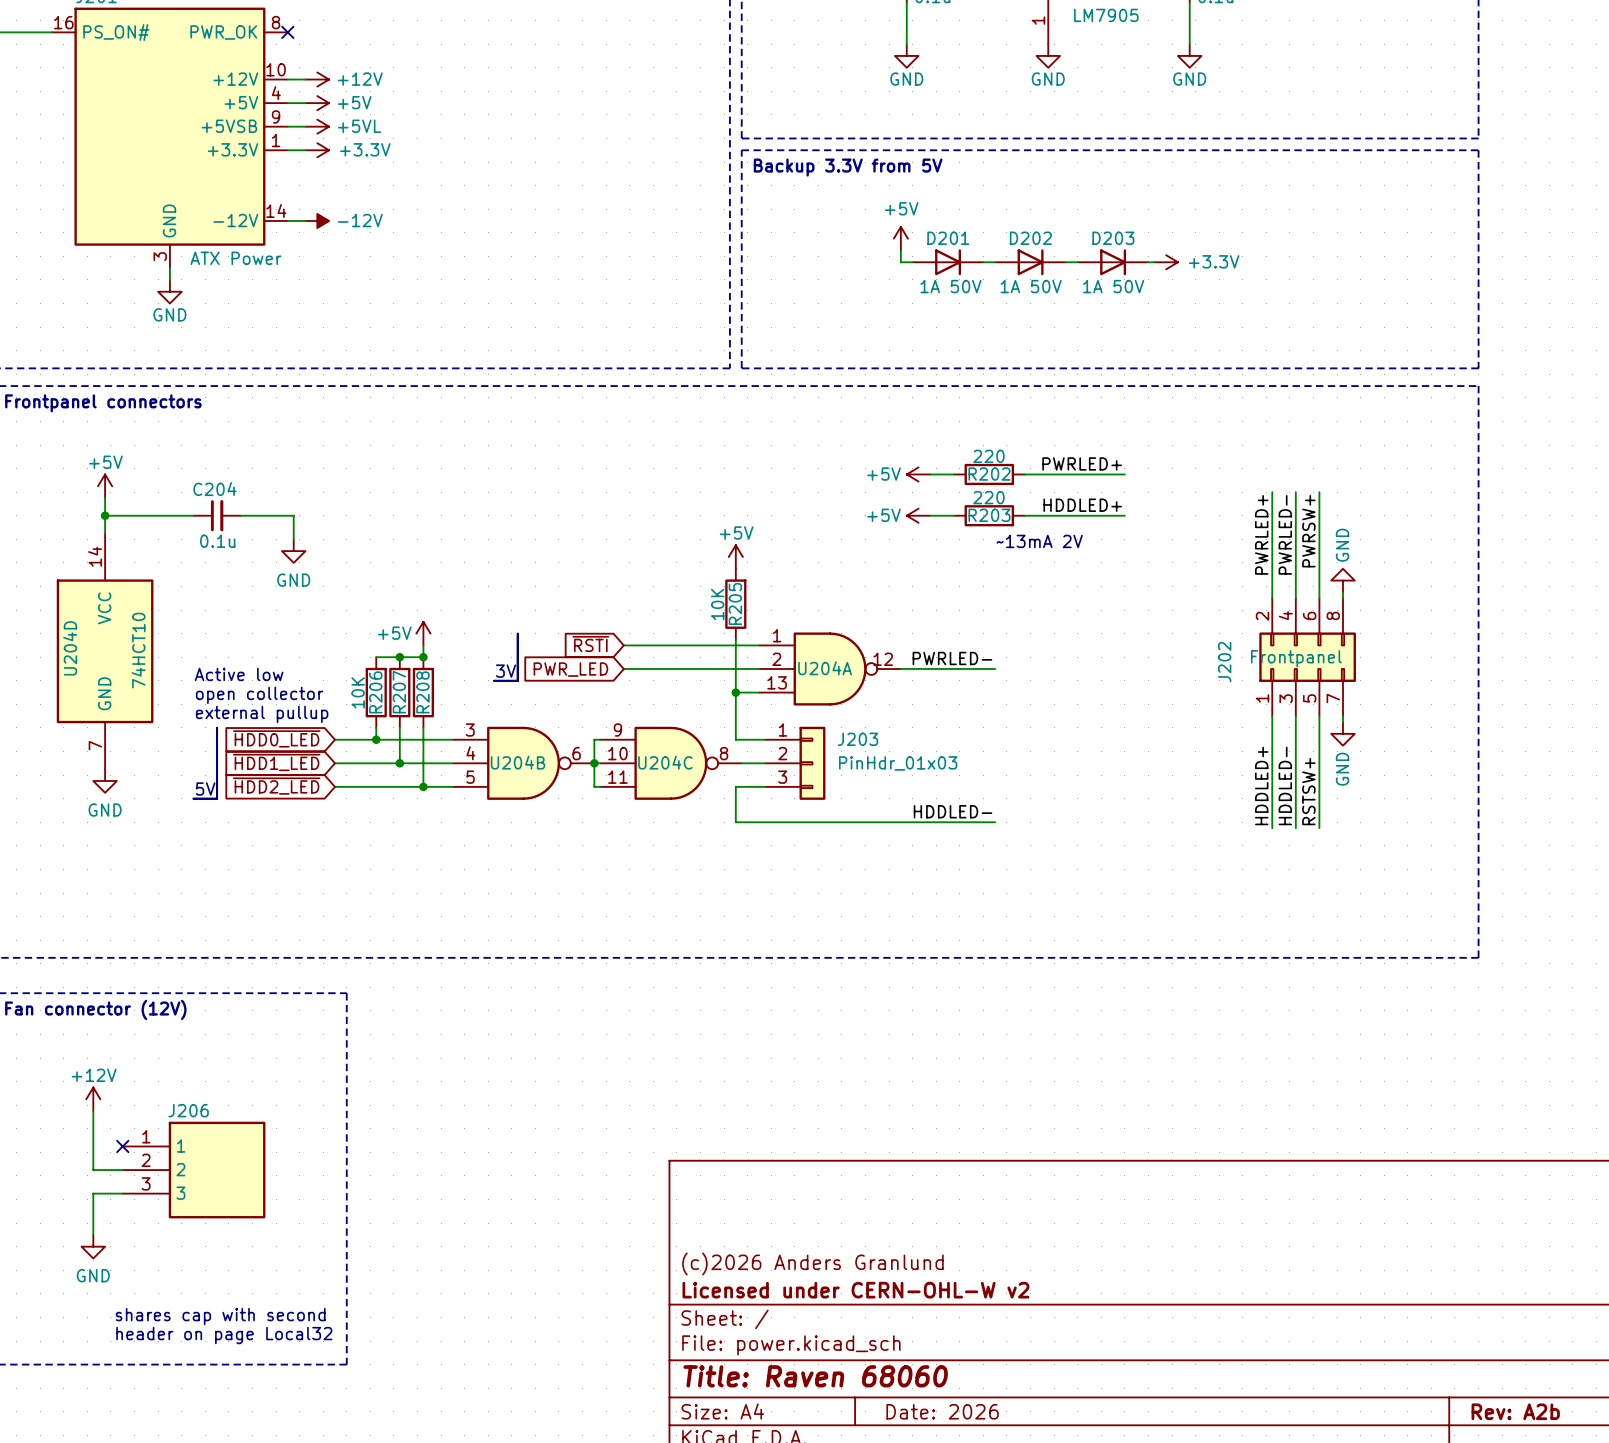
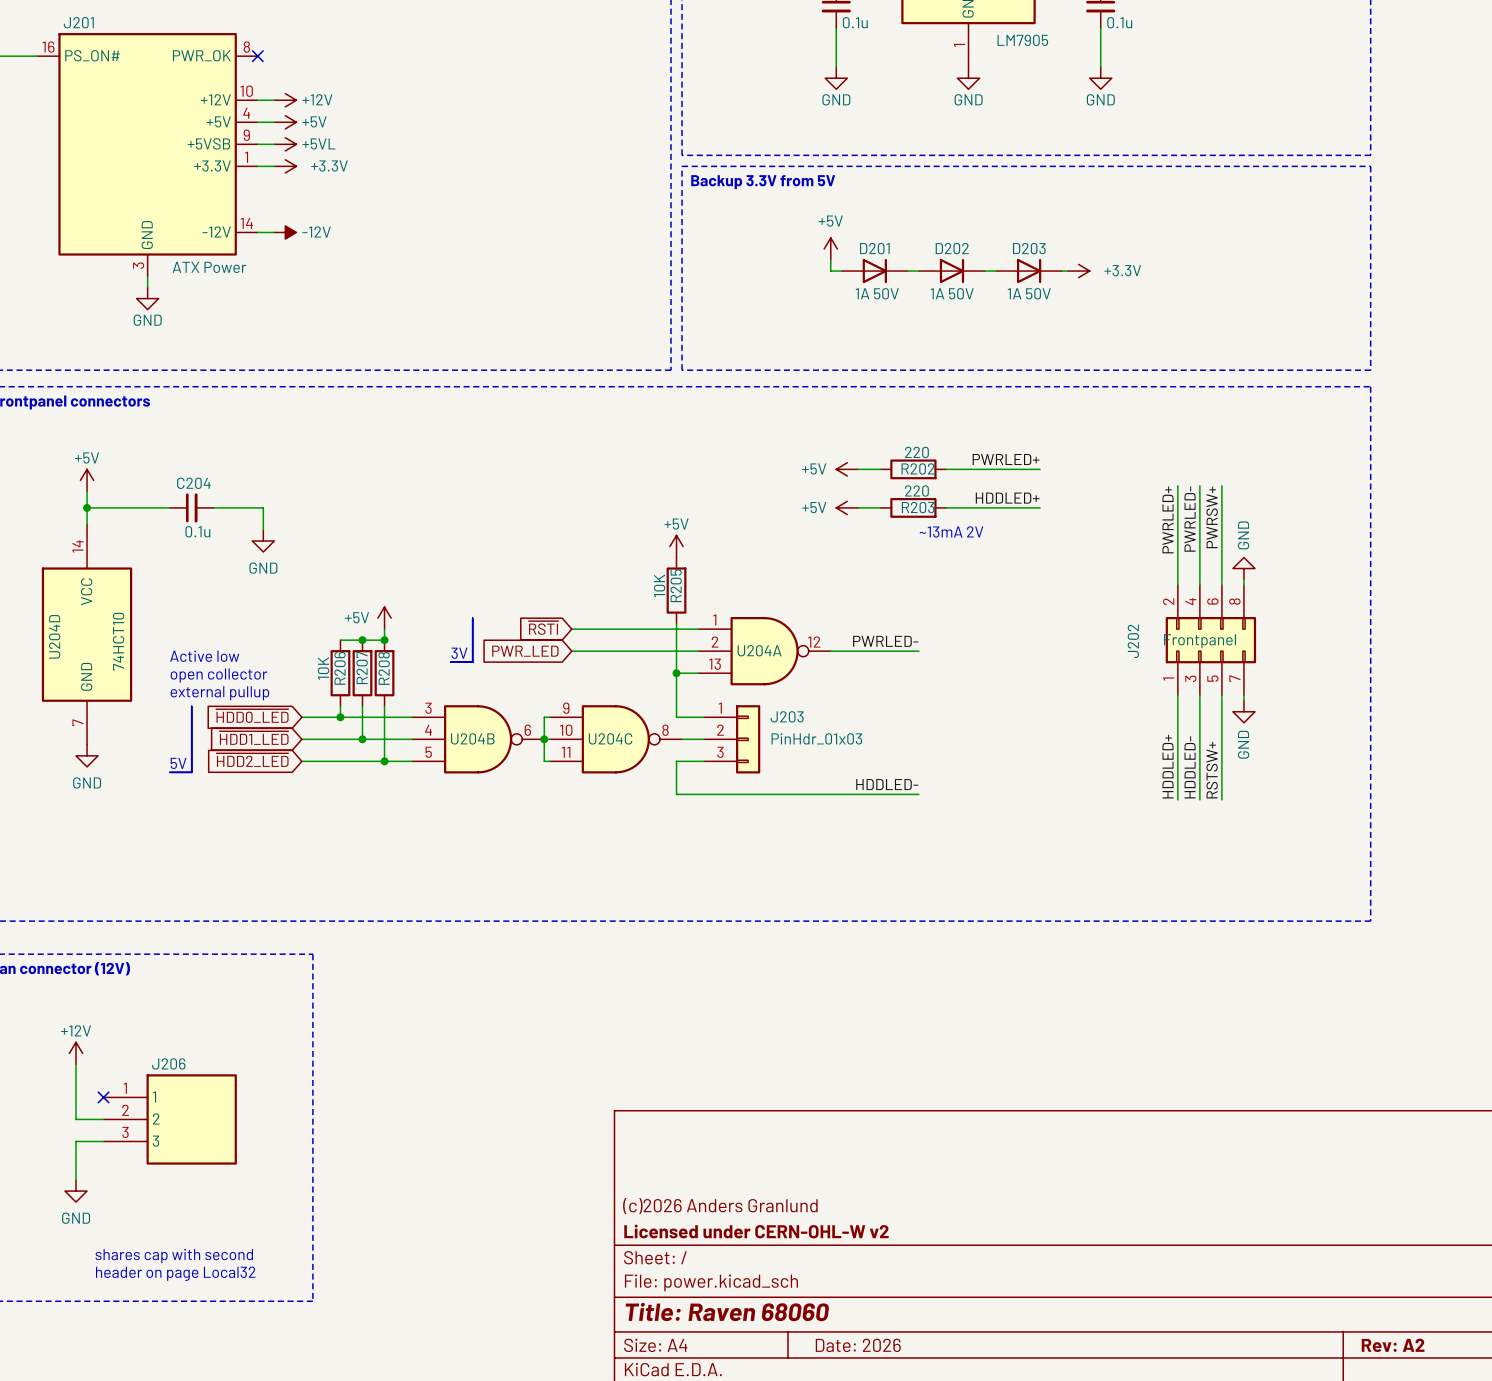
title block: Rev: A2b (1515, 1411) -> Rev: A2 (1393, 1345)

